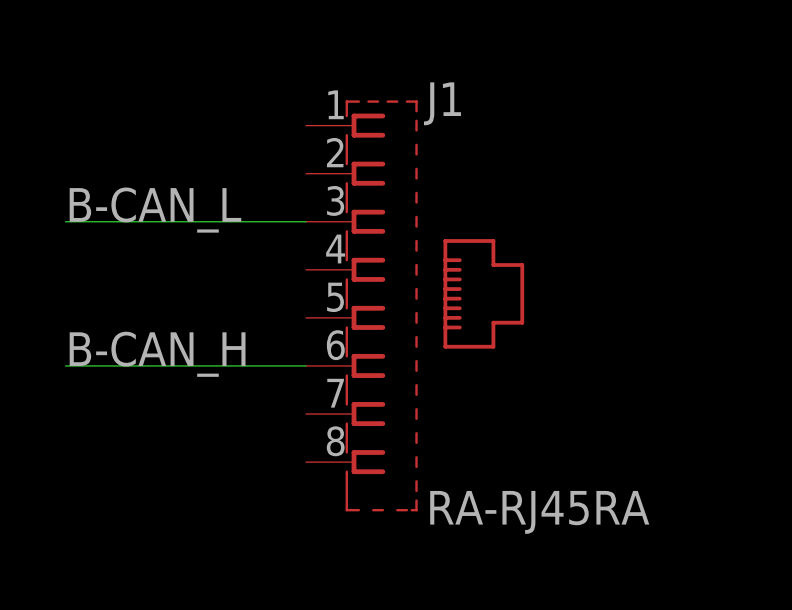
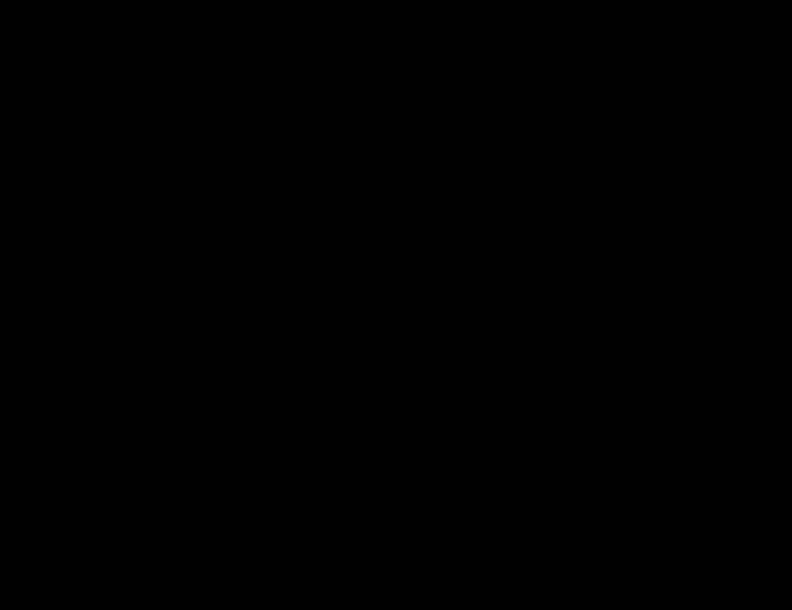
label: B-CAN_L (155, 210) -> none
wire: (65, 221) (305, 221) -> none
J1: RA-RJ45RA (415, 305) -> none
label: B-CAN_H (157, 354) -> none
wire: (65, 365) (305, 365) -> none

